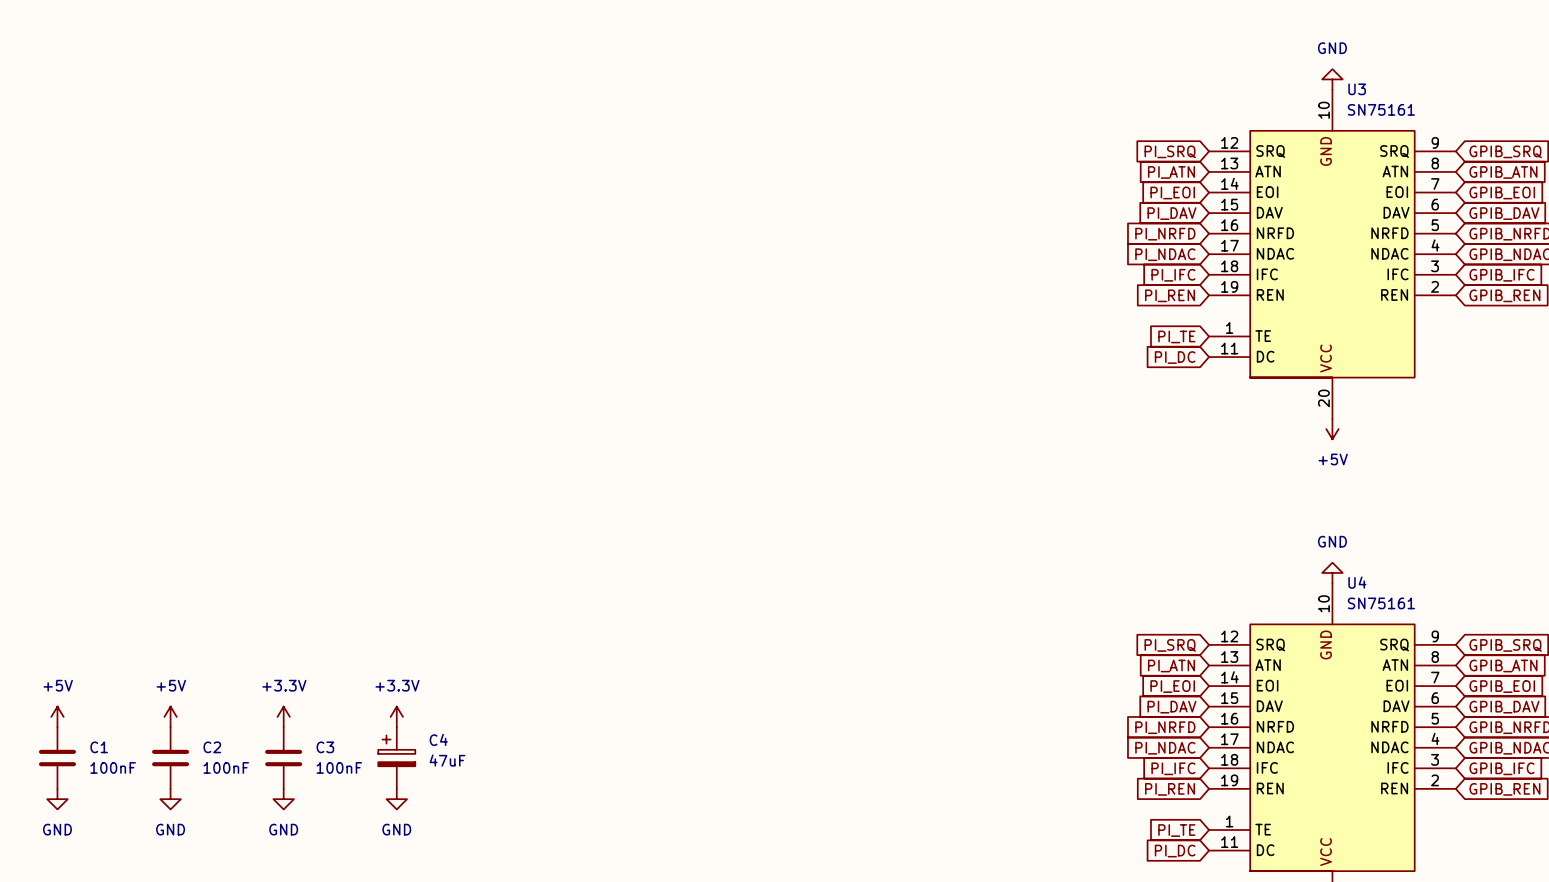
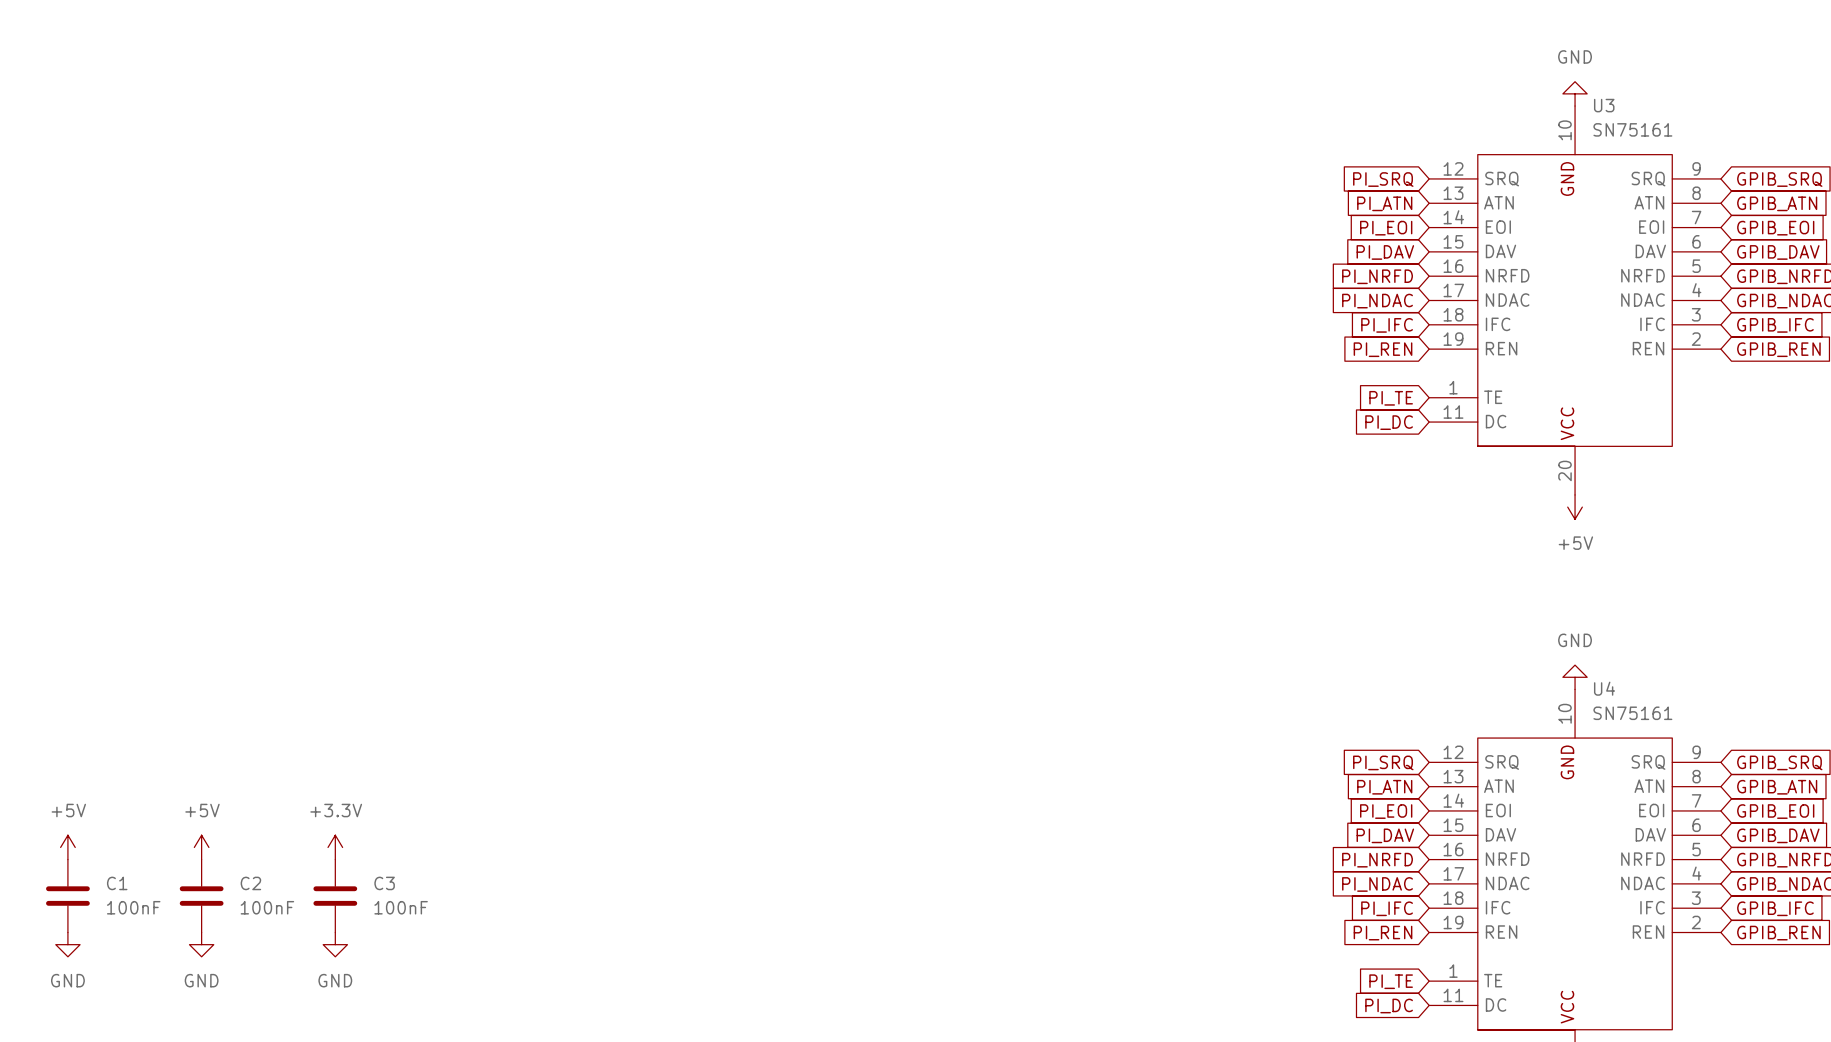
power symbol: +3.3V (396, 716) -> none
C4: 47uF (396, 758) -> none
power symbol: GND (396, 799) -> none

